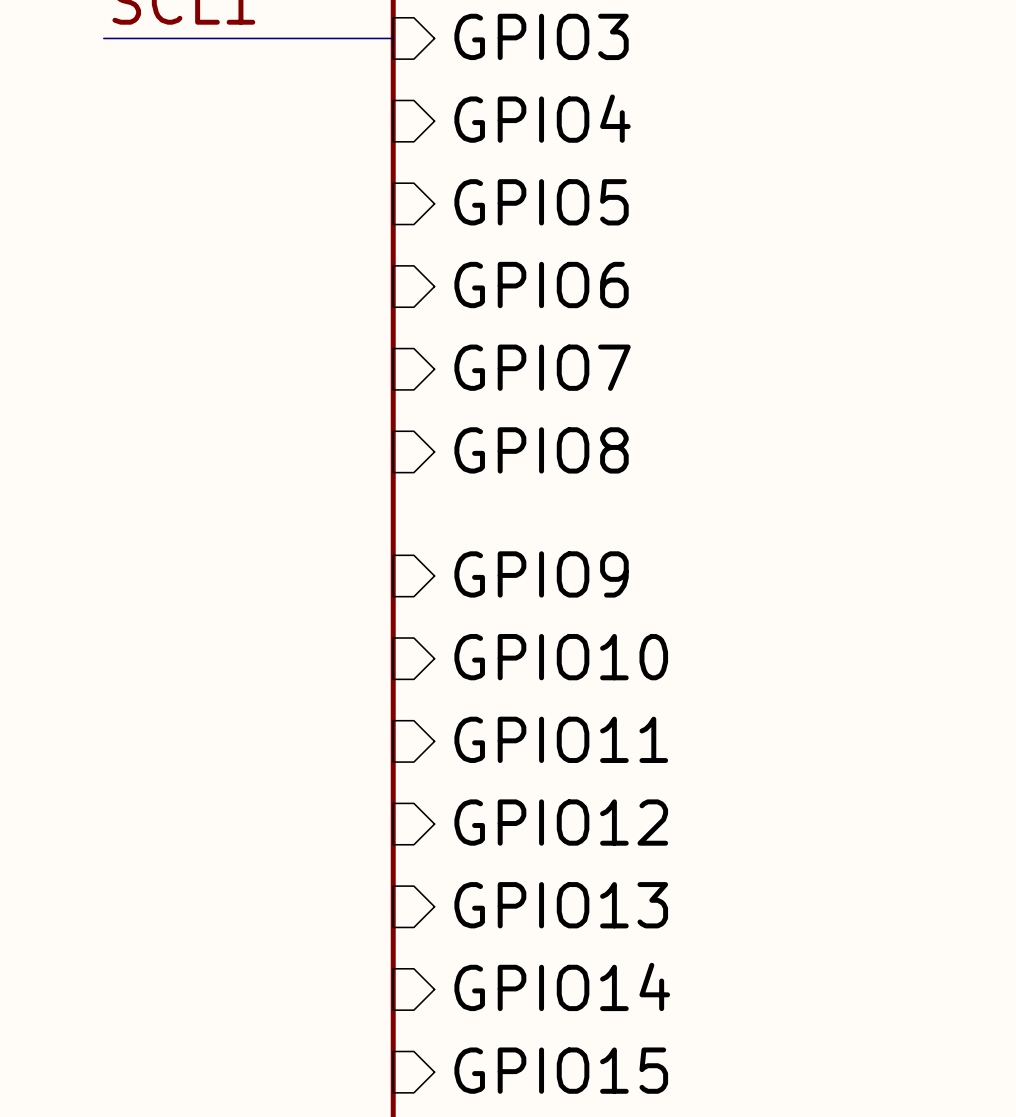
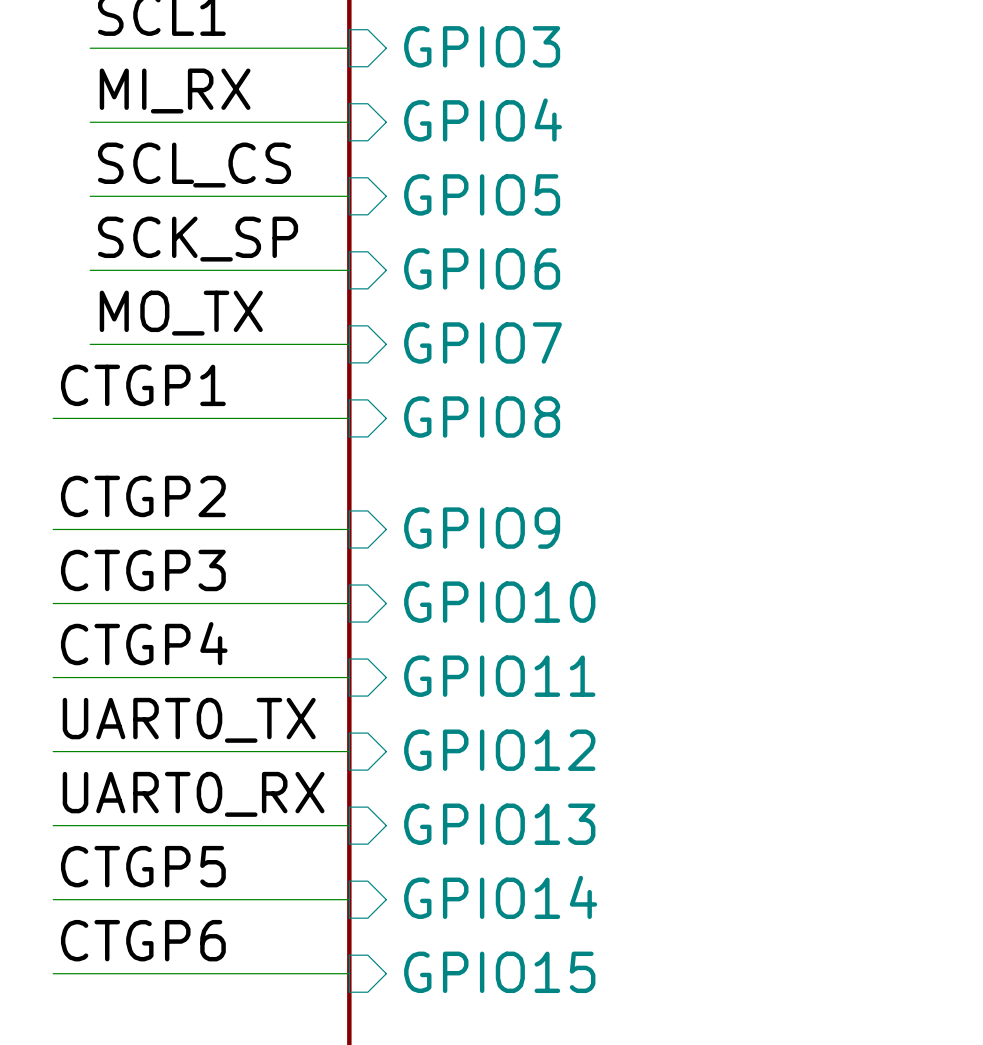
label: none -> MI_RX (175, 90)
wire: none -> (90, 122) (349, 122)
label: none -> SCL_CS (194, 165)
wire: none -> (90, 196) (349, 196)
label: none -> SCK_SP (198, 239)
wire: none -> (90, 270) (349, 270)
label: none -> MO_TX (181, 313)
wire: none -> (90, 344) (349, 344)
label: none -> CTGP1 (143, 385)
wire: none -> (53, 418) (349, 418)
label: none -> CTGP2 (143, 496)
wire: none -> (53, 529) (349, 529)
label: none -> CTGP3 (143, 570)
wire: none -> (53, 603) (349, 603)
label: none -> CTGP4 (144, 643)
wire: none -> (53, 677) (349, 677)
label: none -> UART0_TX (189, 720)
wire: none -> (53, 751) (349, 751)
label: none -> UART0_RX (193, 794)
wire: none -> (53, 825) (349, 825)
label: none -> CTGP5 (143, 866)
wire: none -> (53, 899) (349, 899)
label: none -> CTGP6 (143, 940)
wire: none -> (53, 973) (349, 973)

